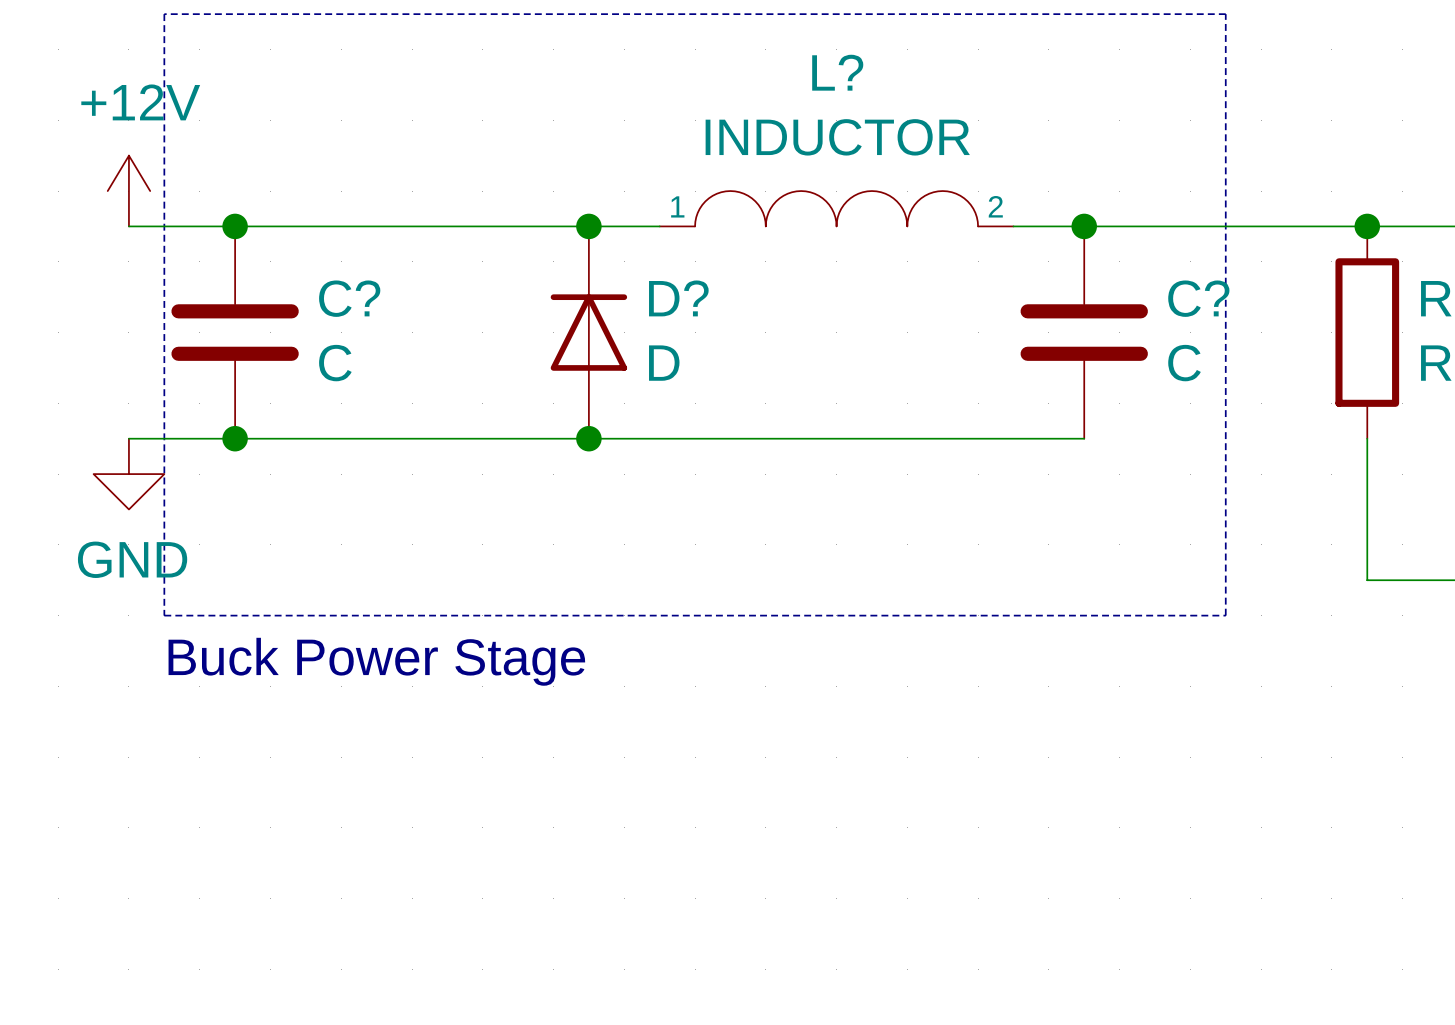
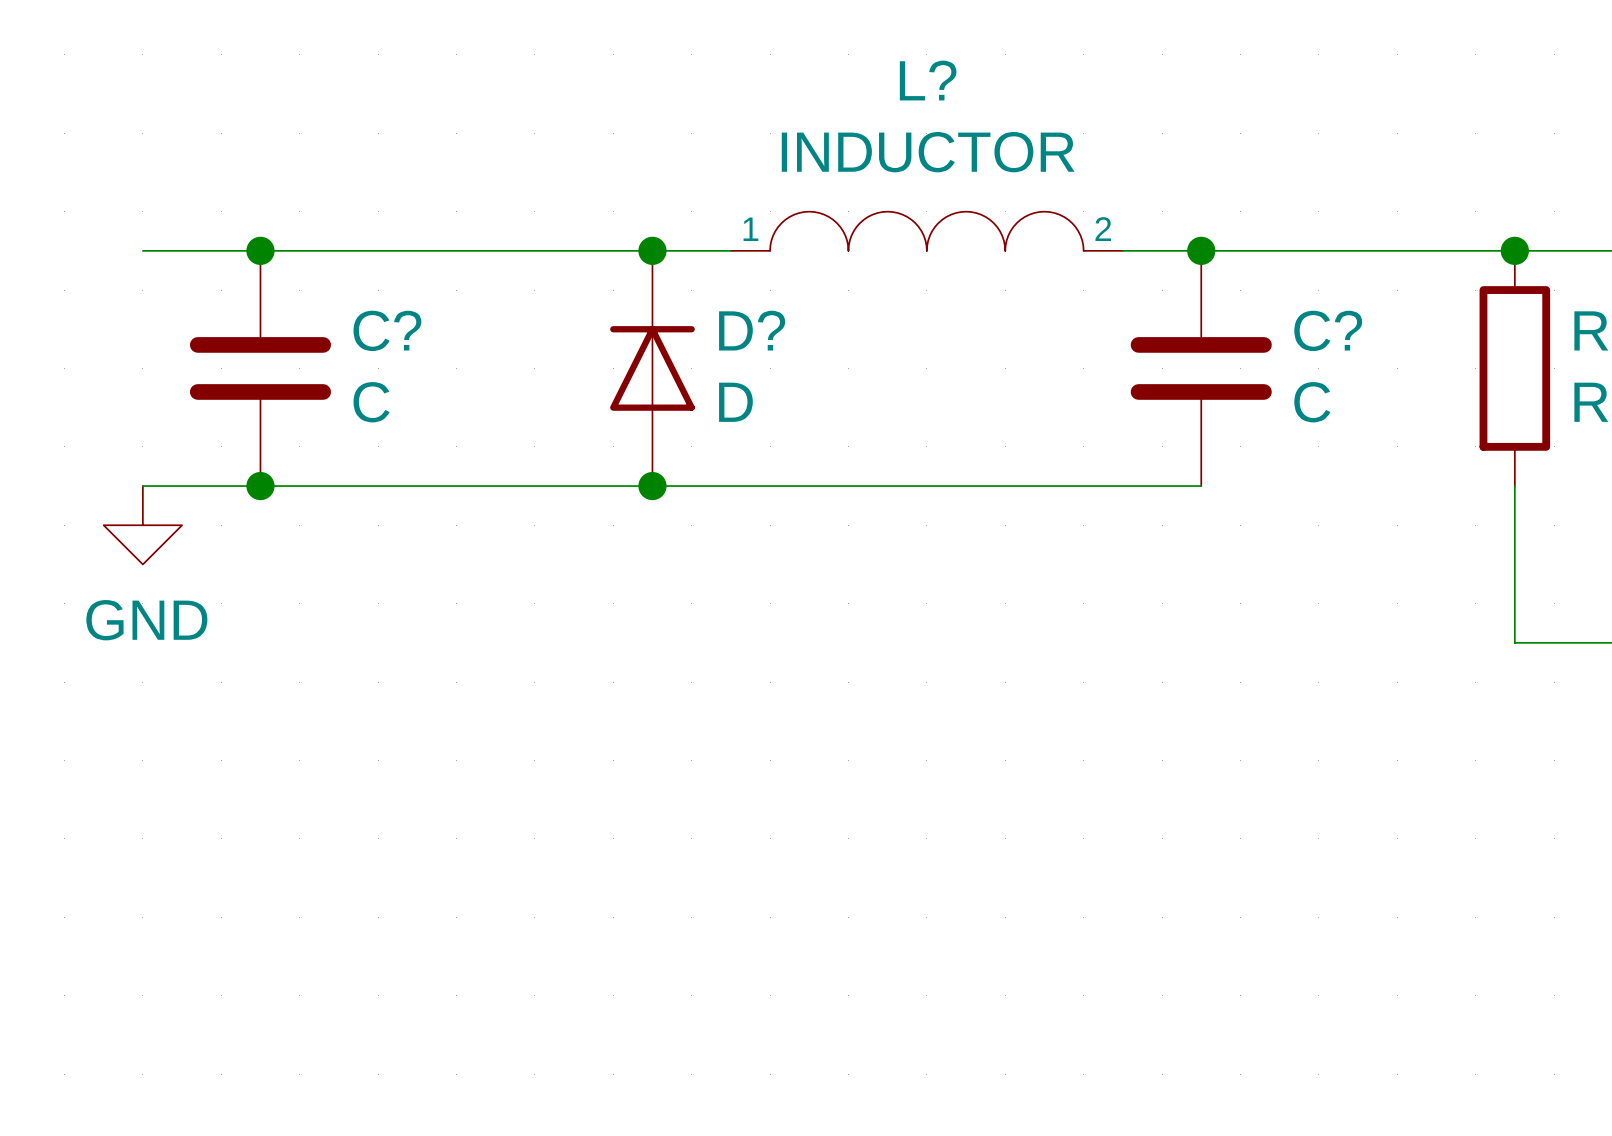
line: (164, 14) (164, 615) (1225, 615) (1225, 14) (164, 14) -> none
power symbol: +12V (128, 191) -> none
text: Buck Power Stage (376, 661) -> none

